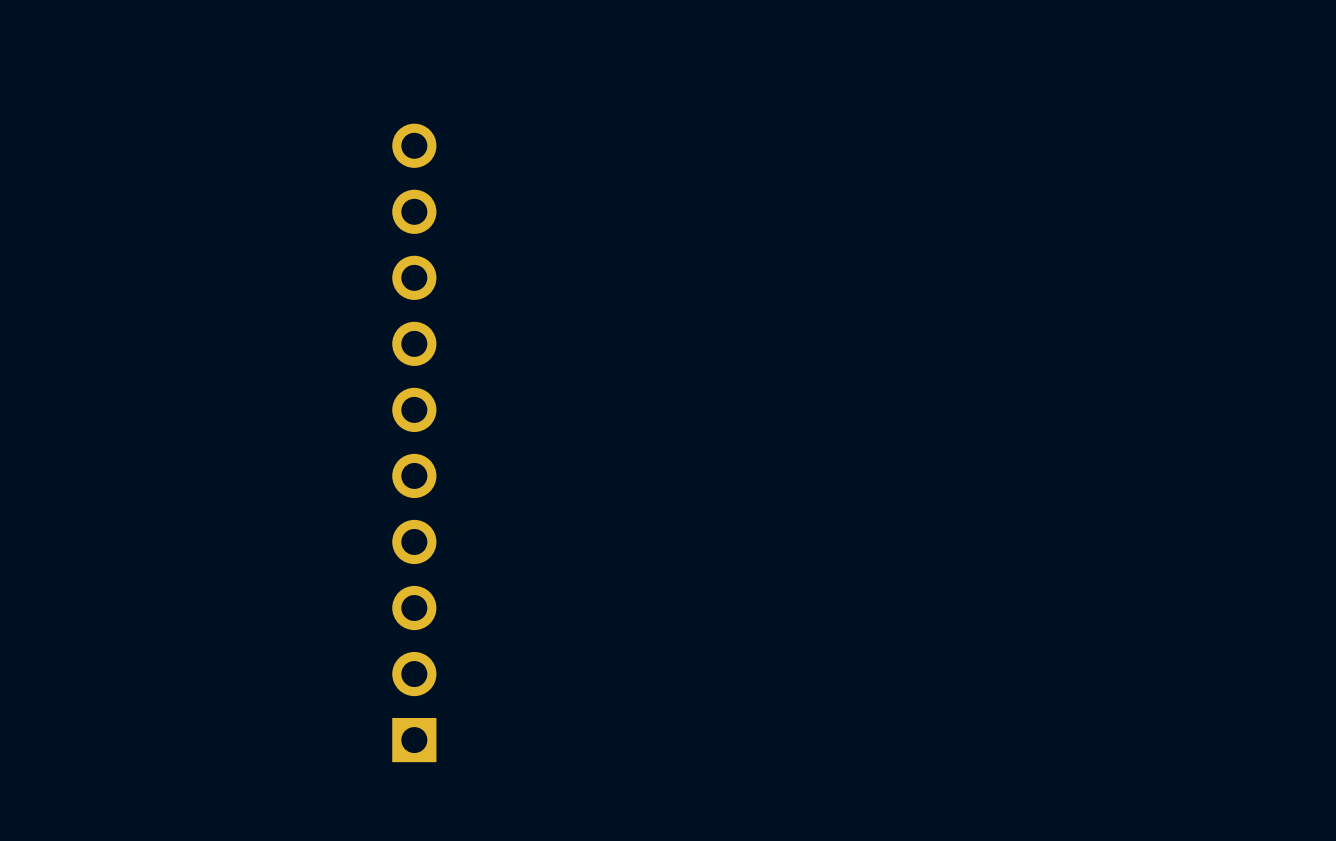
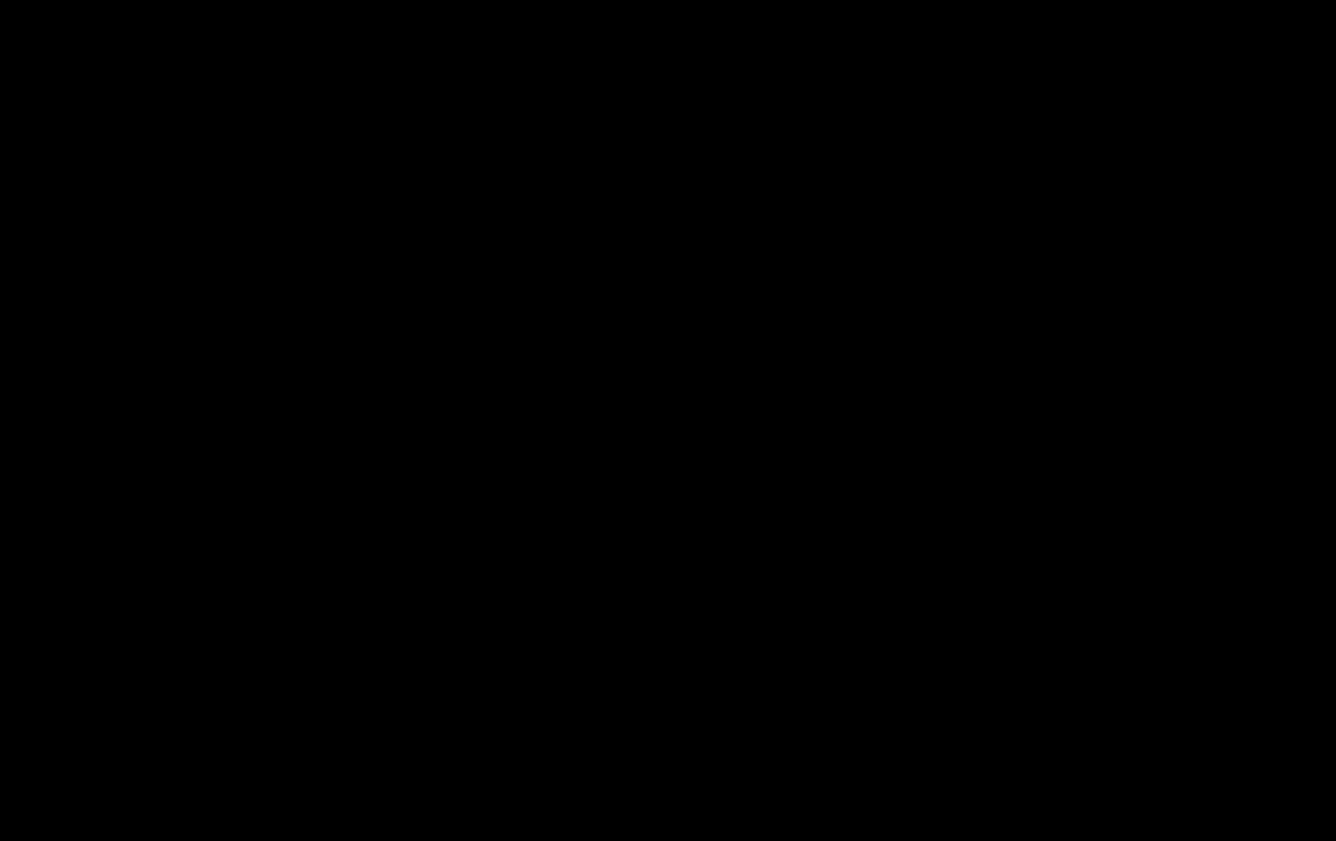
part: (414, 442) -> none

